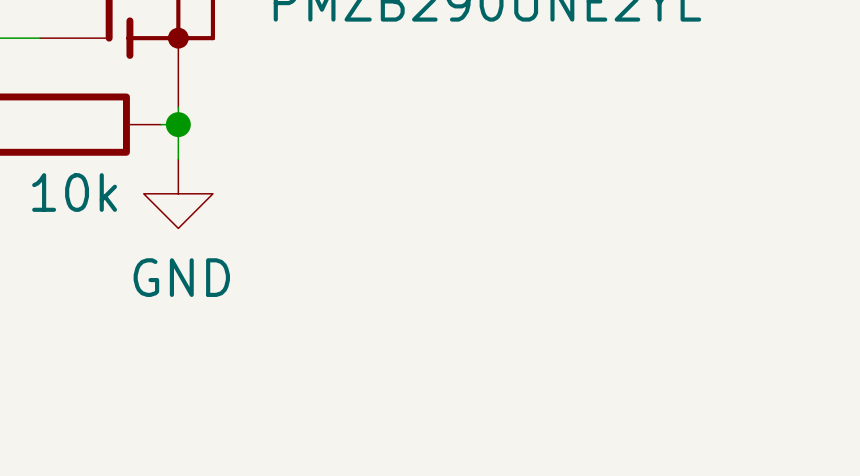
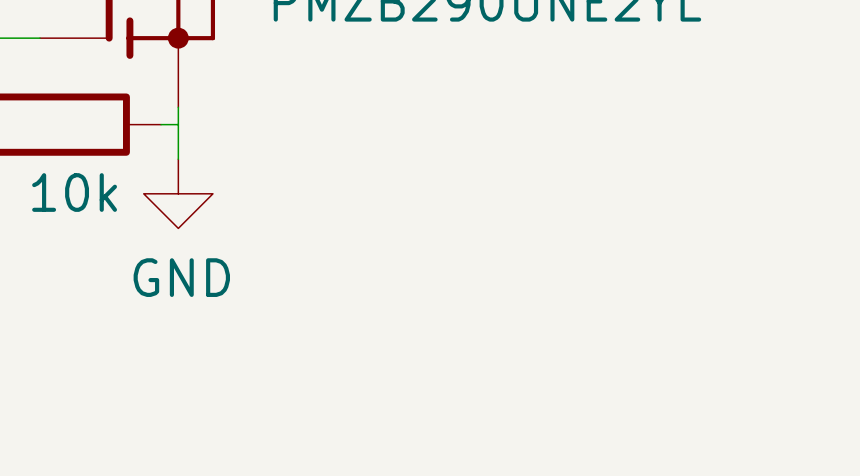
junction: (178, 124) -> none

